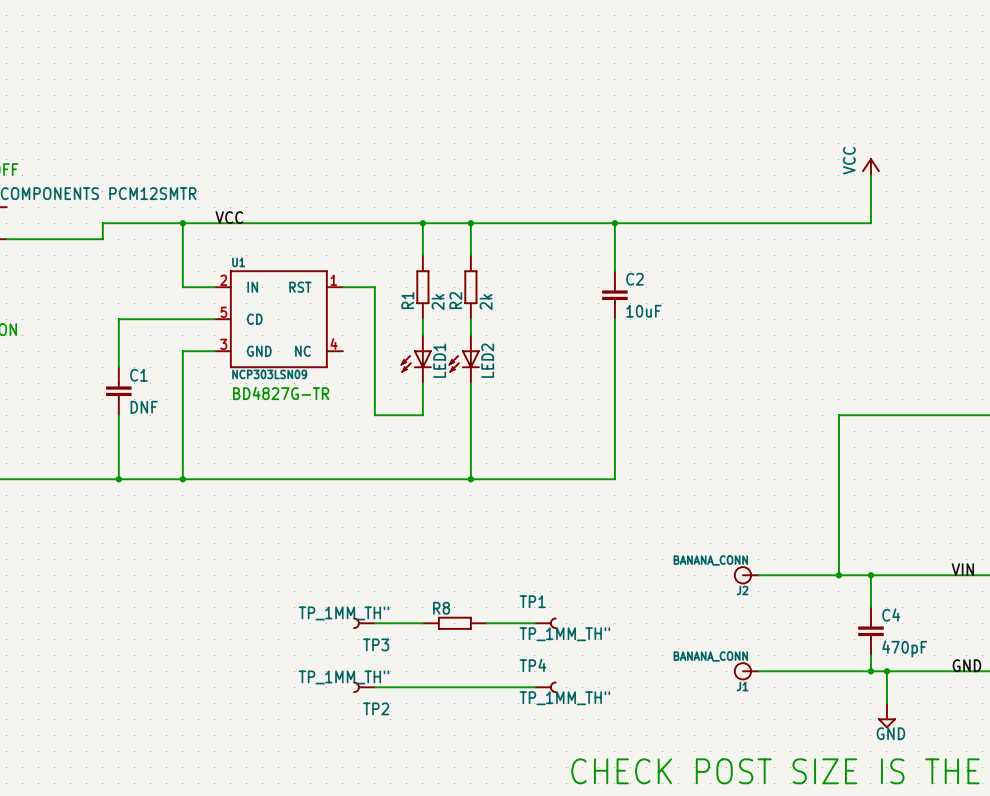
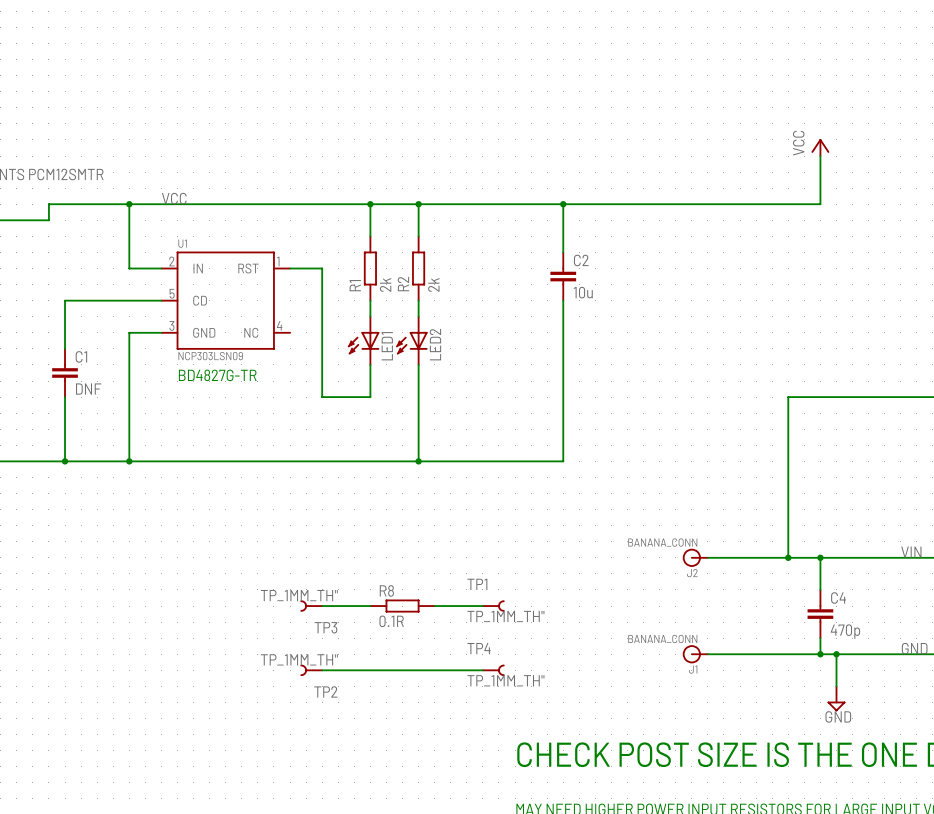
C2 value: 10uF (643, 311) -> 10u (583, 292)
R8 value: none -> 0.1R (391, 621)
C4 value: 470pF (904, 648) -> 470p (845, 631)

